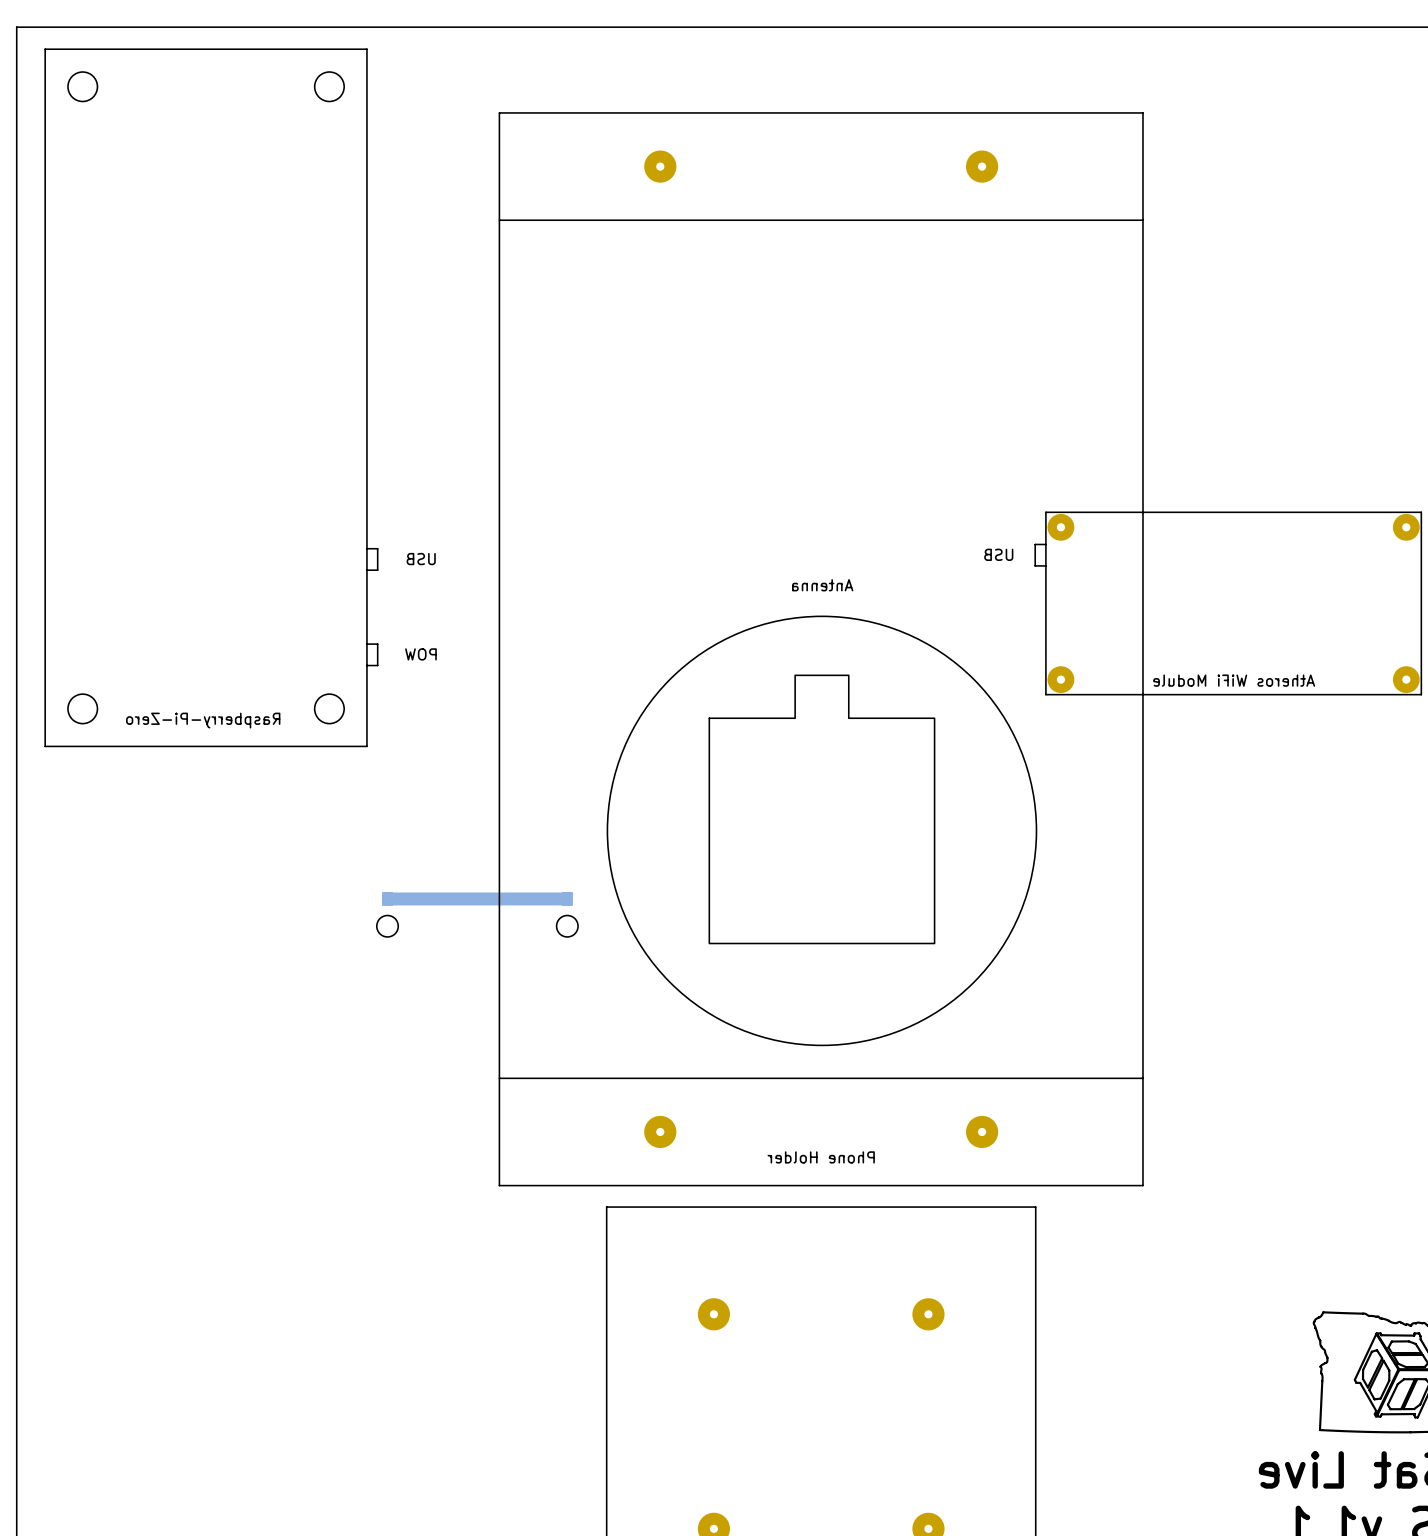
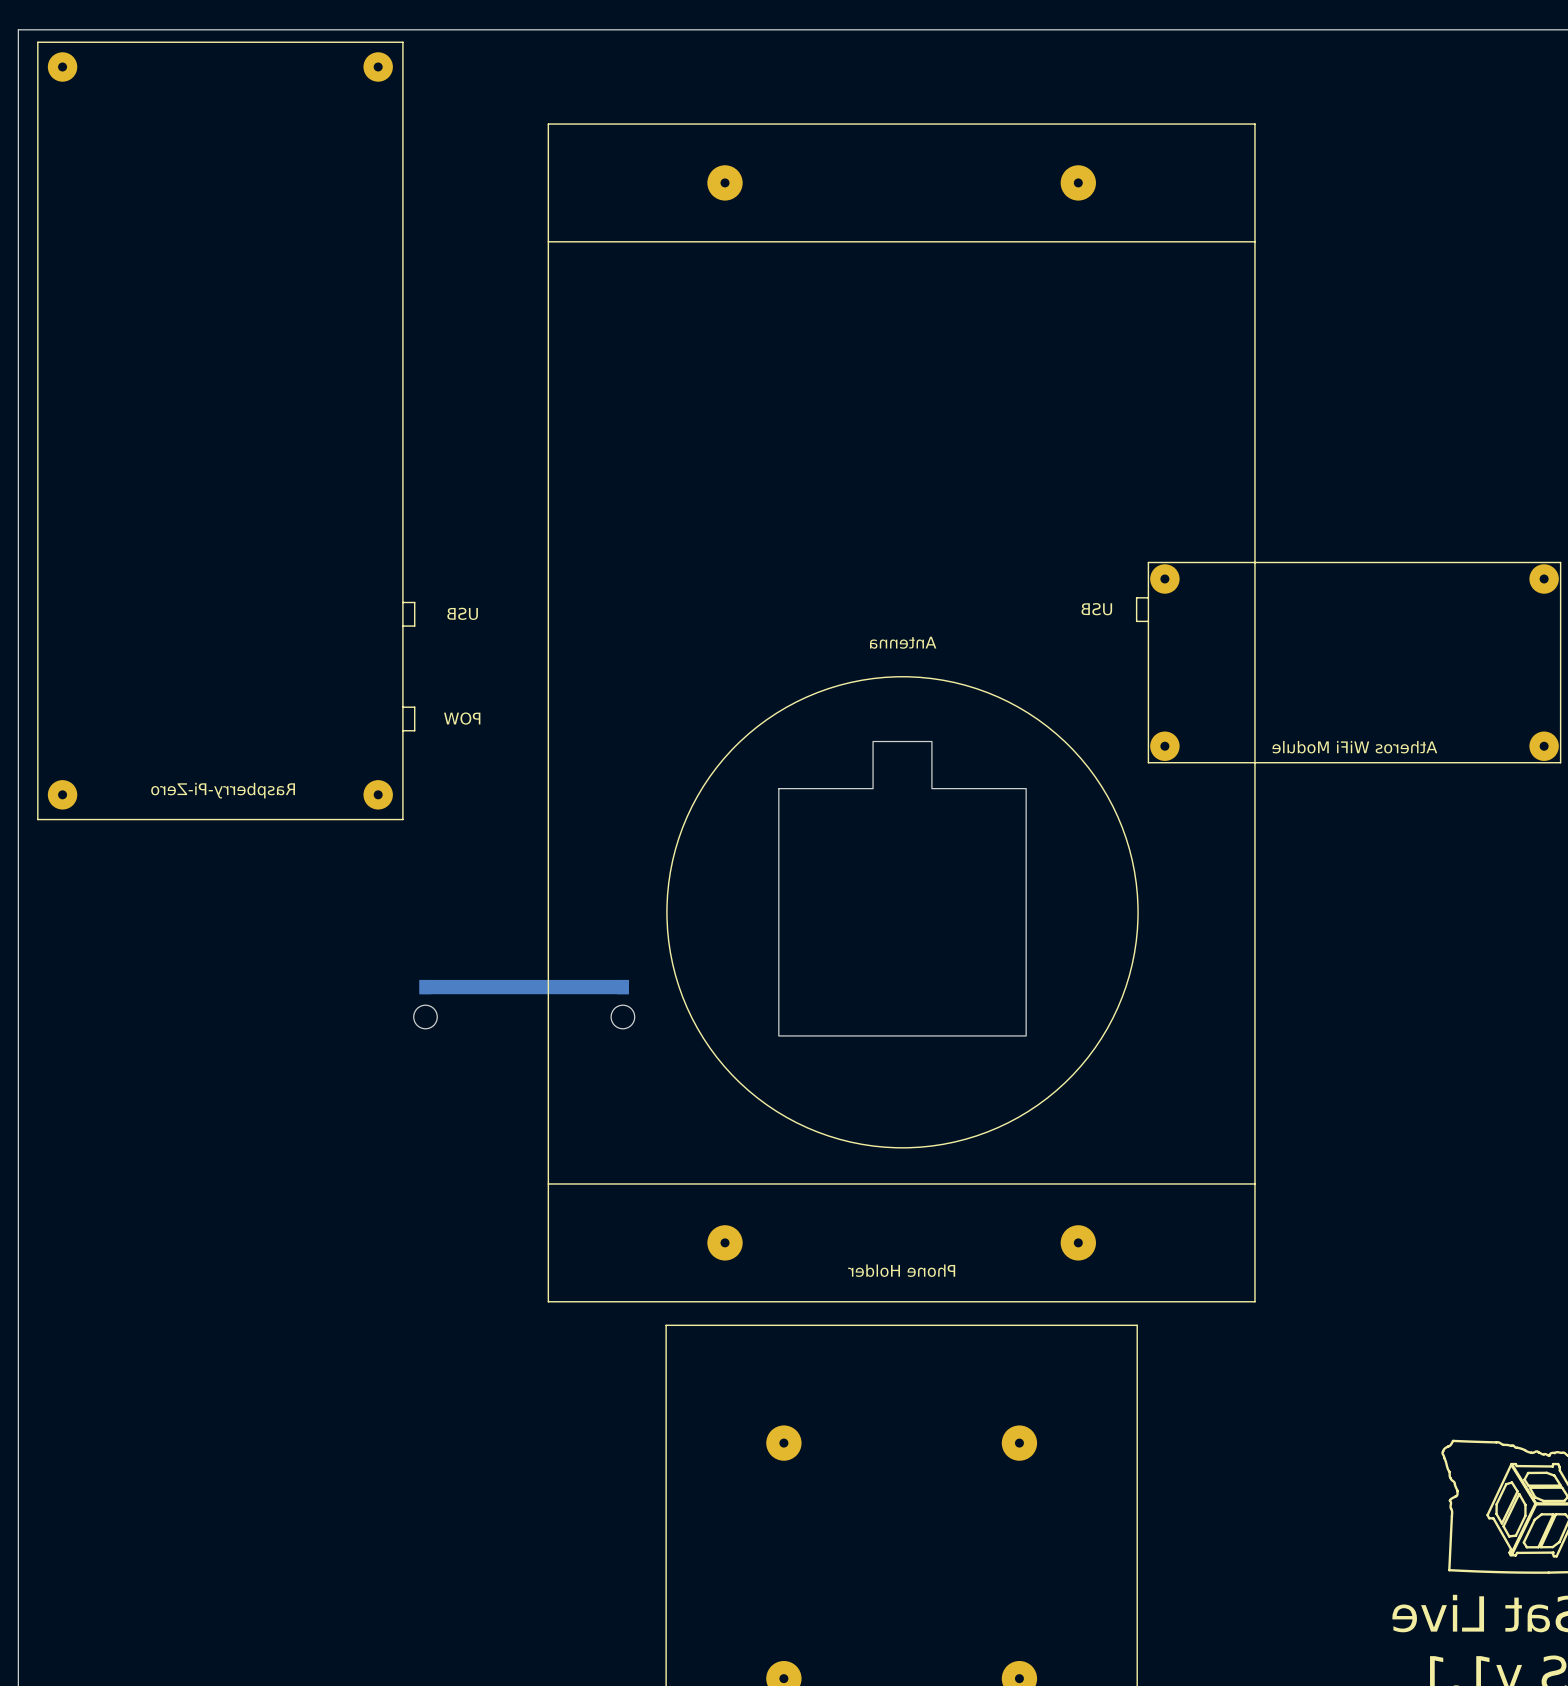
part footprint: [44, 48, 379, 748] -> [37, 41, 416, 821]

